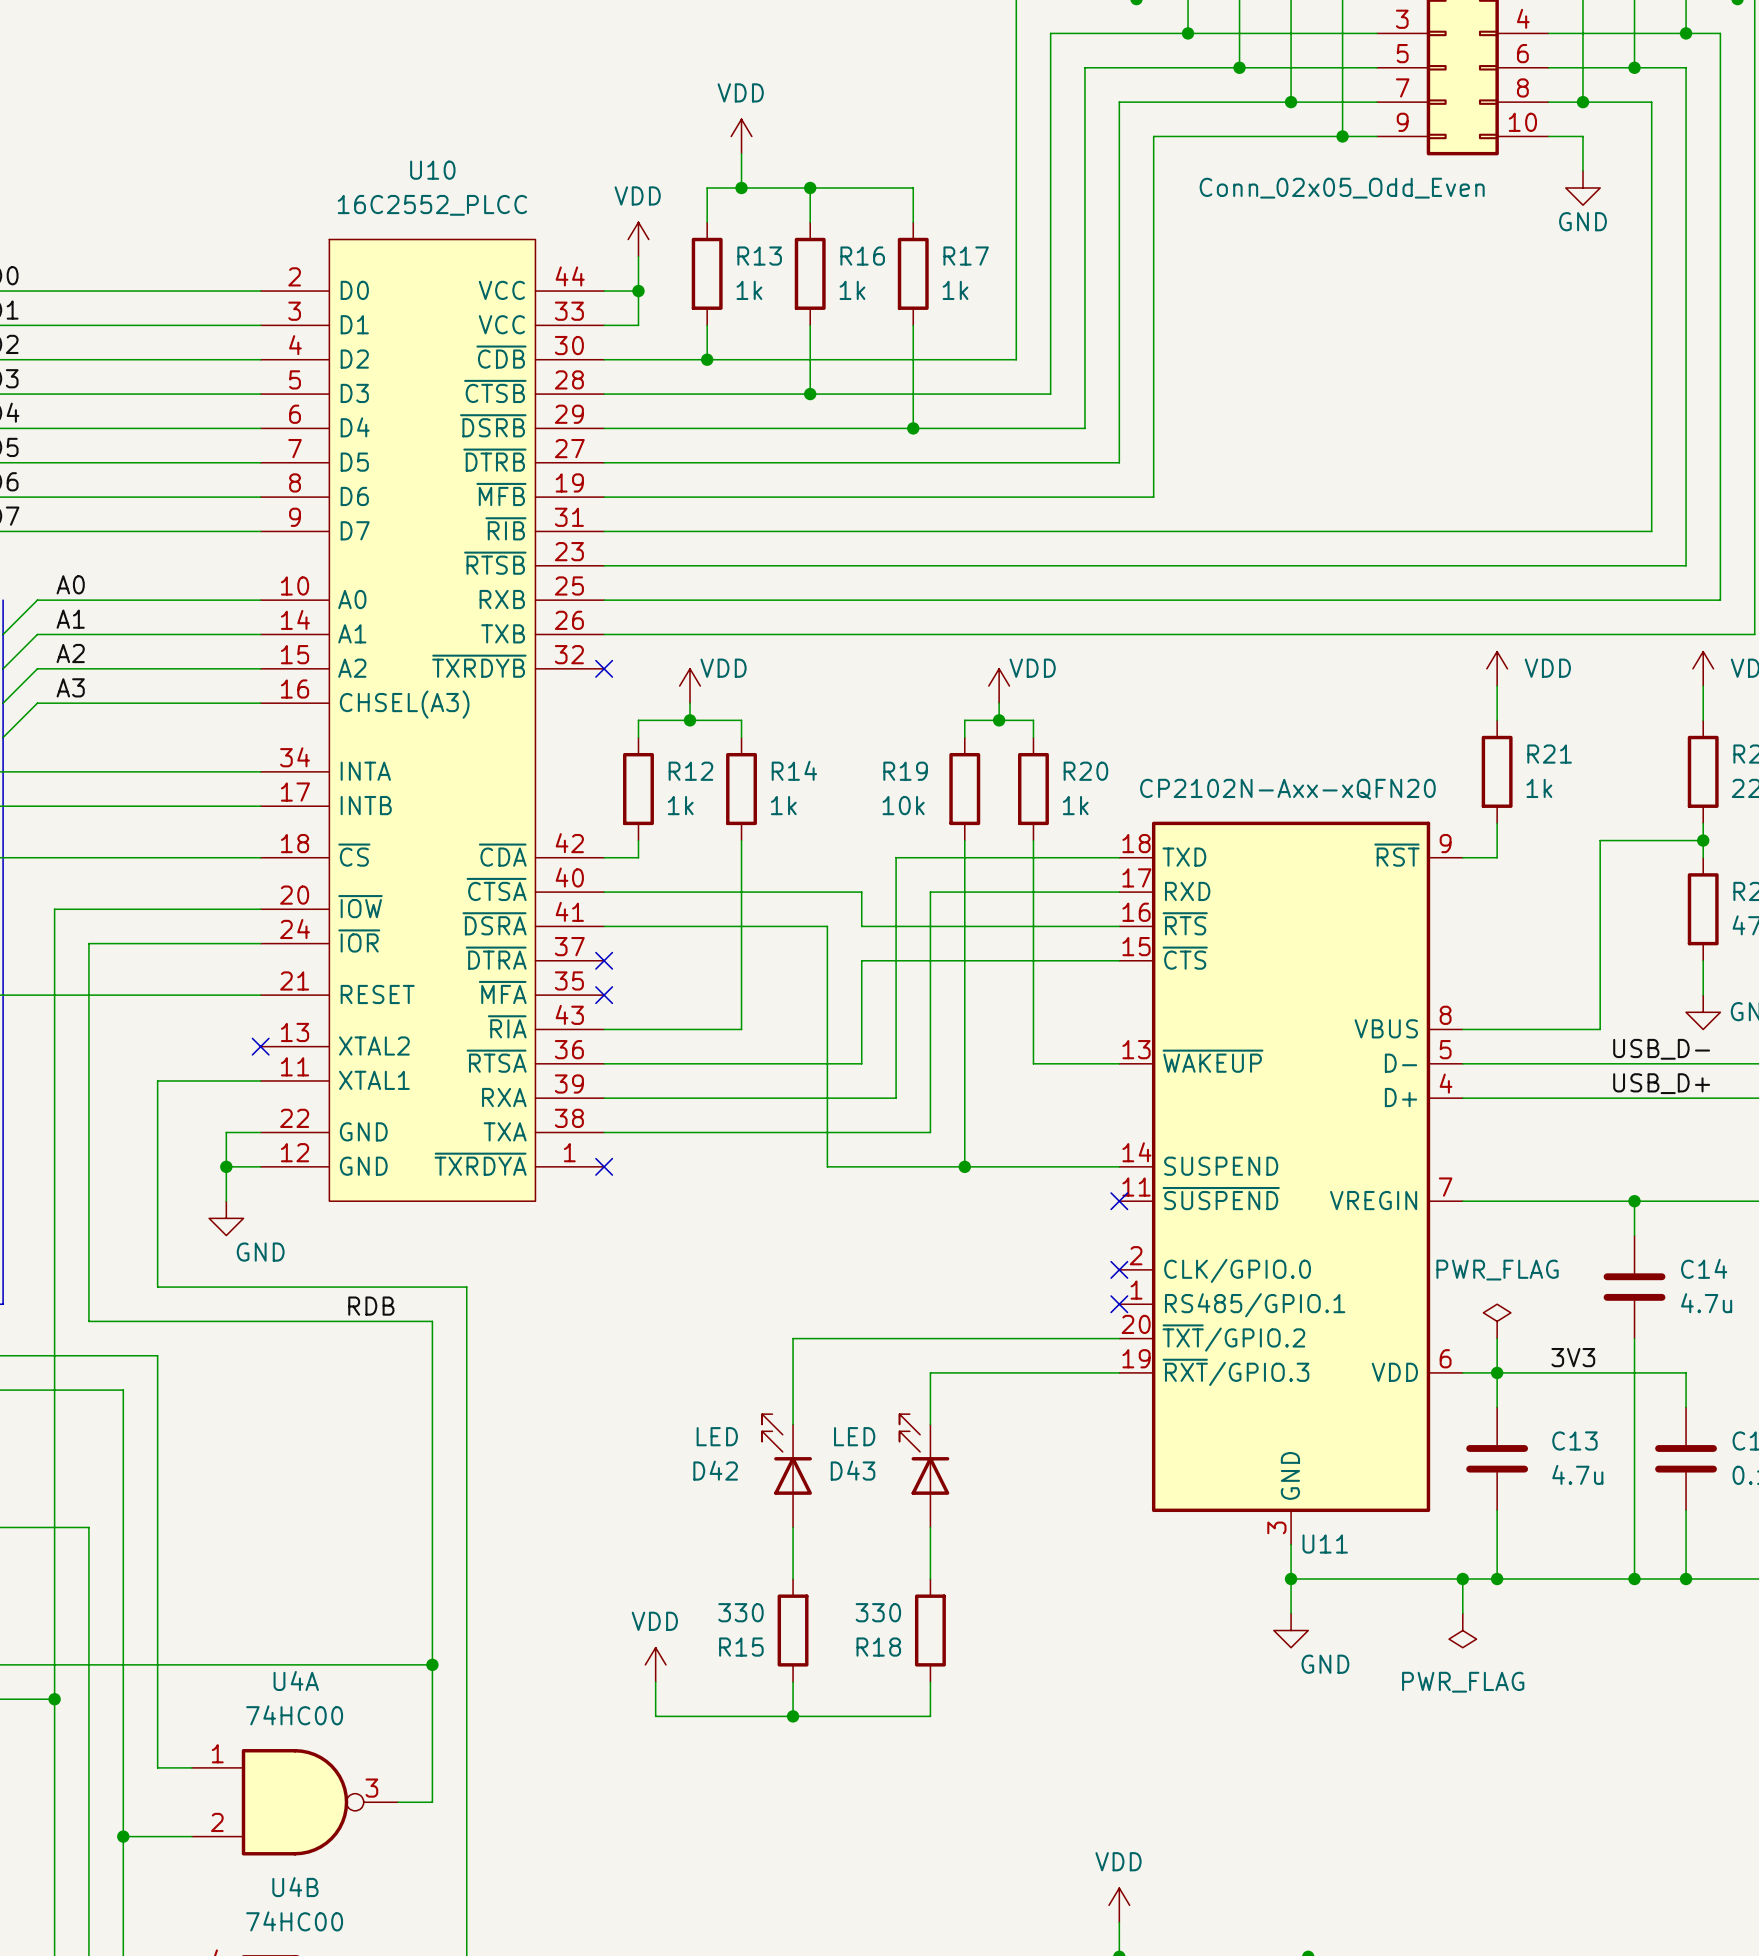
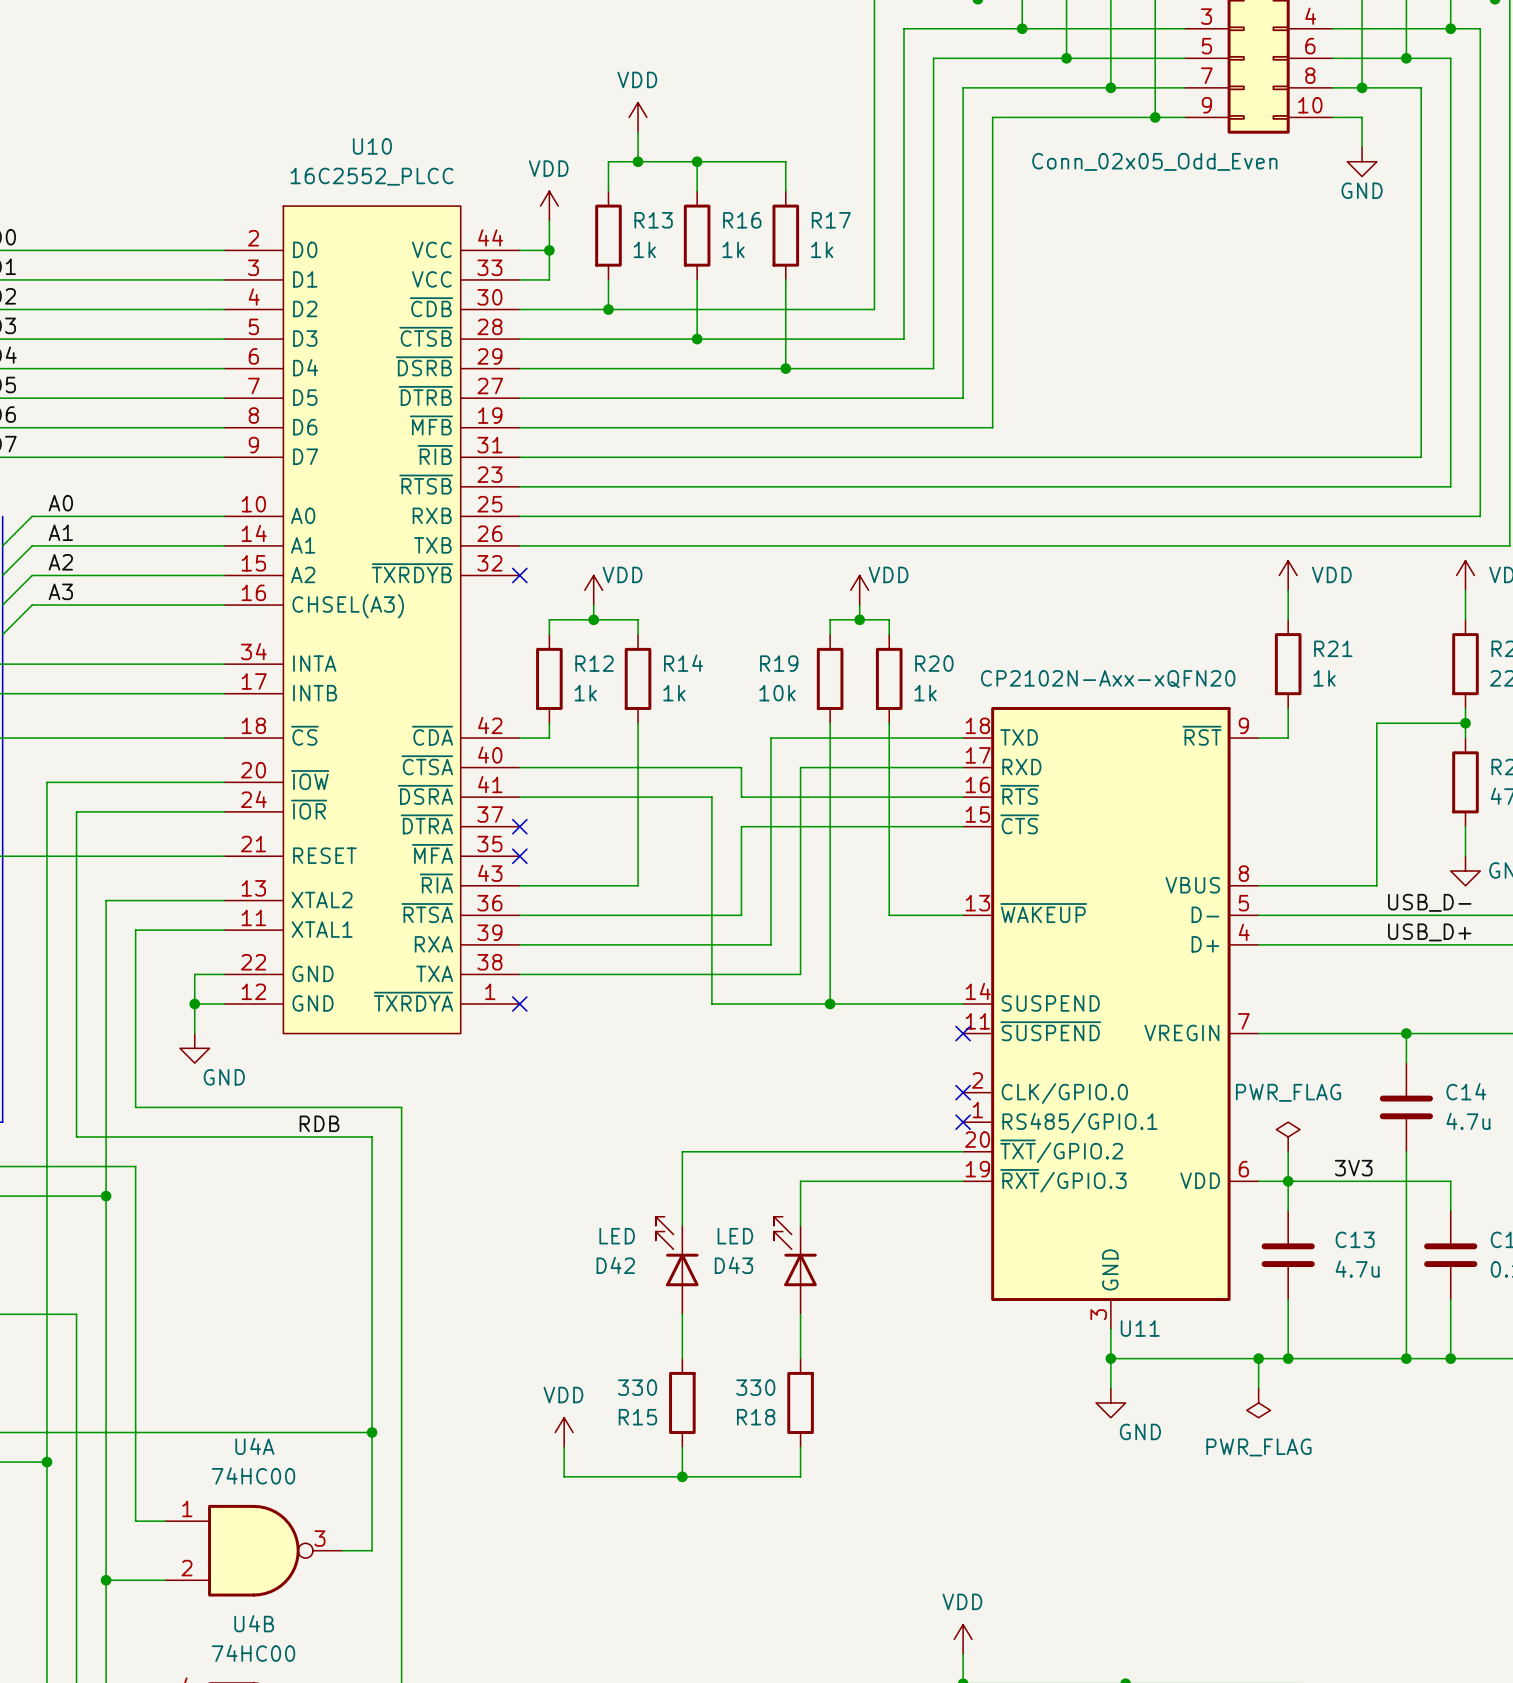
wire: none -> (224, 900) (106, 900) (106, 1196)
no-connect mark: (260, 1046) -> none
junction: none -> (106, 1196)

